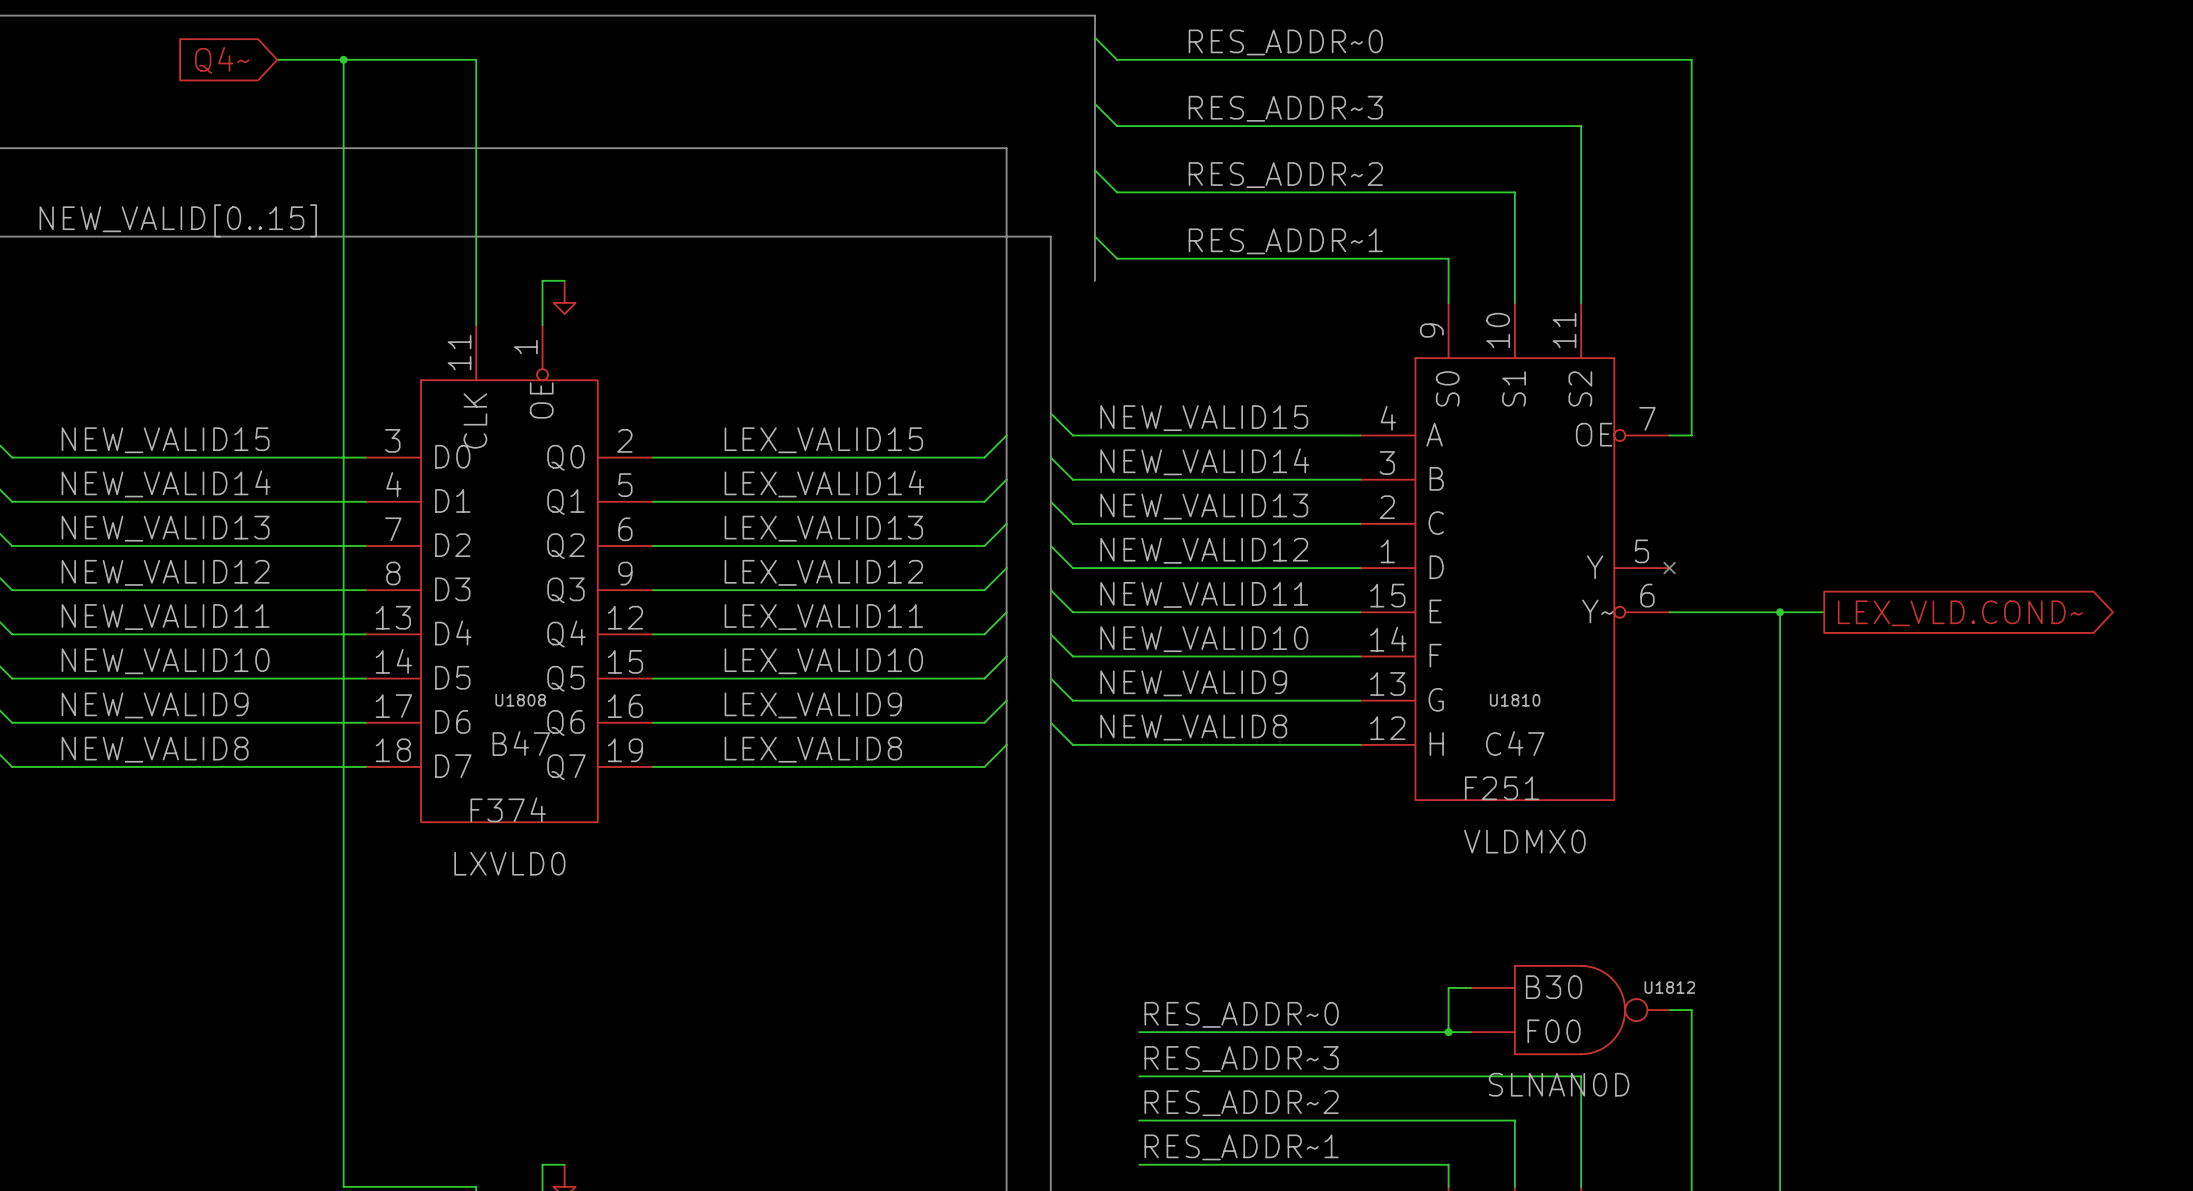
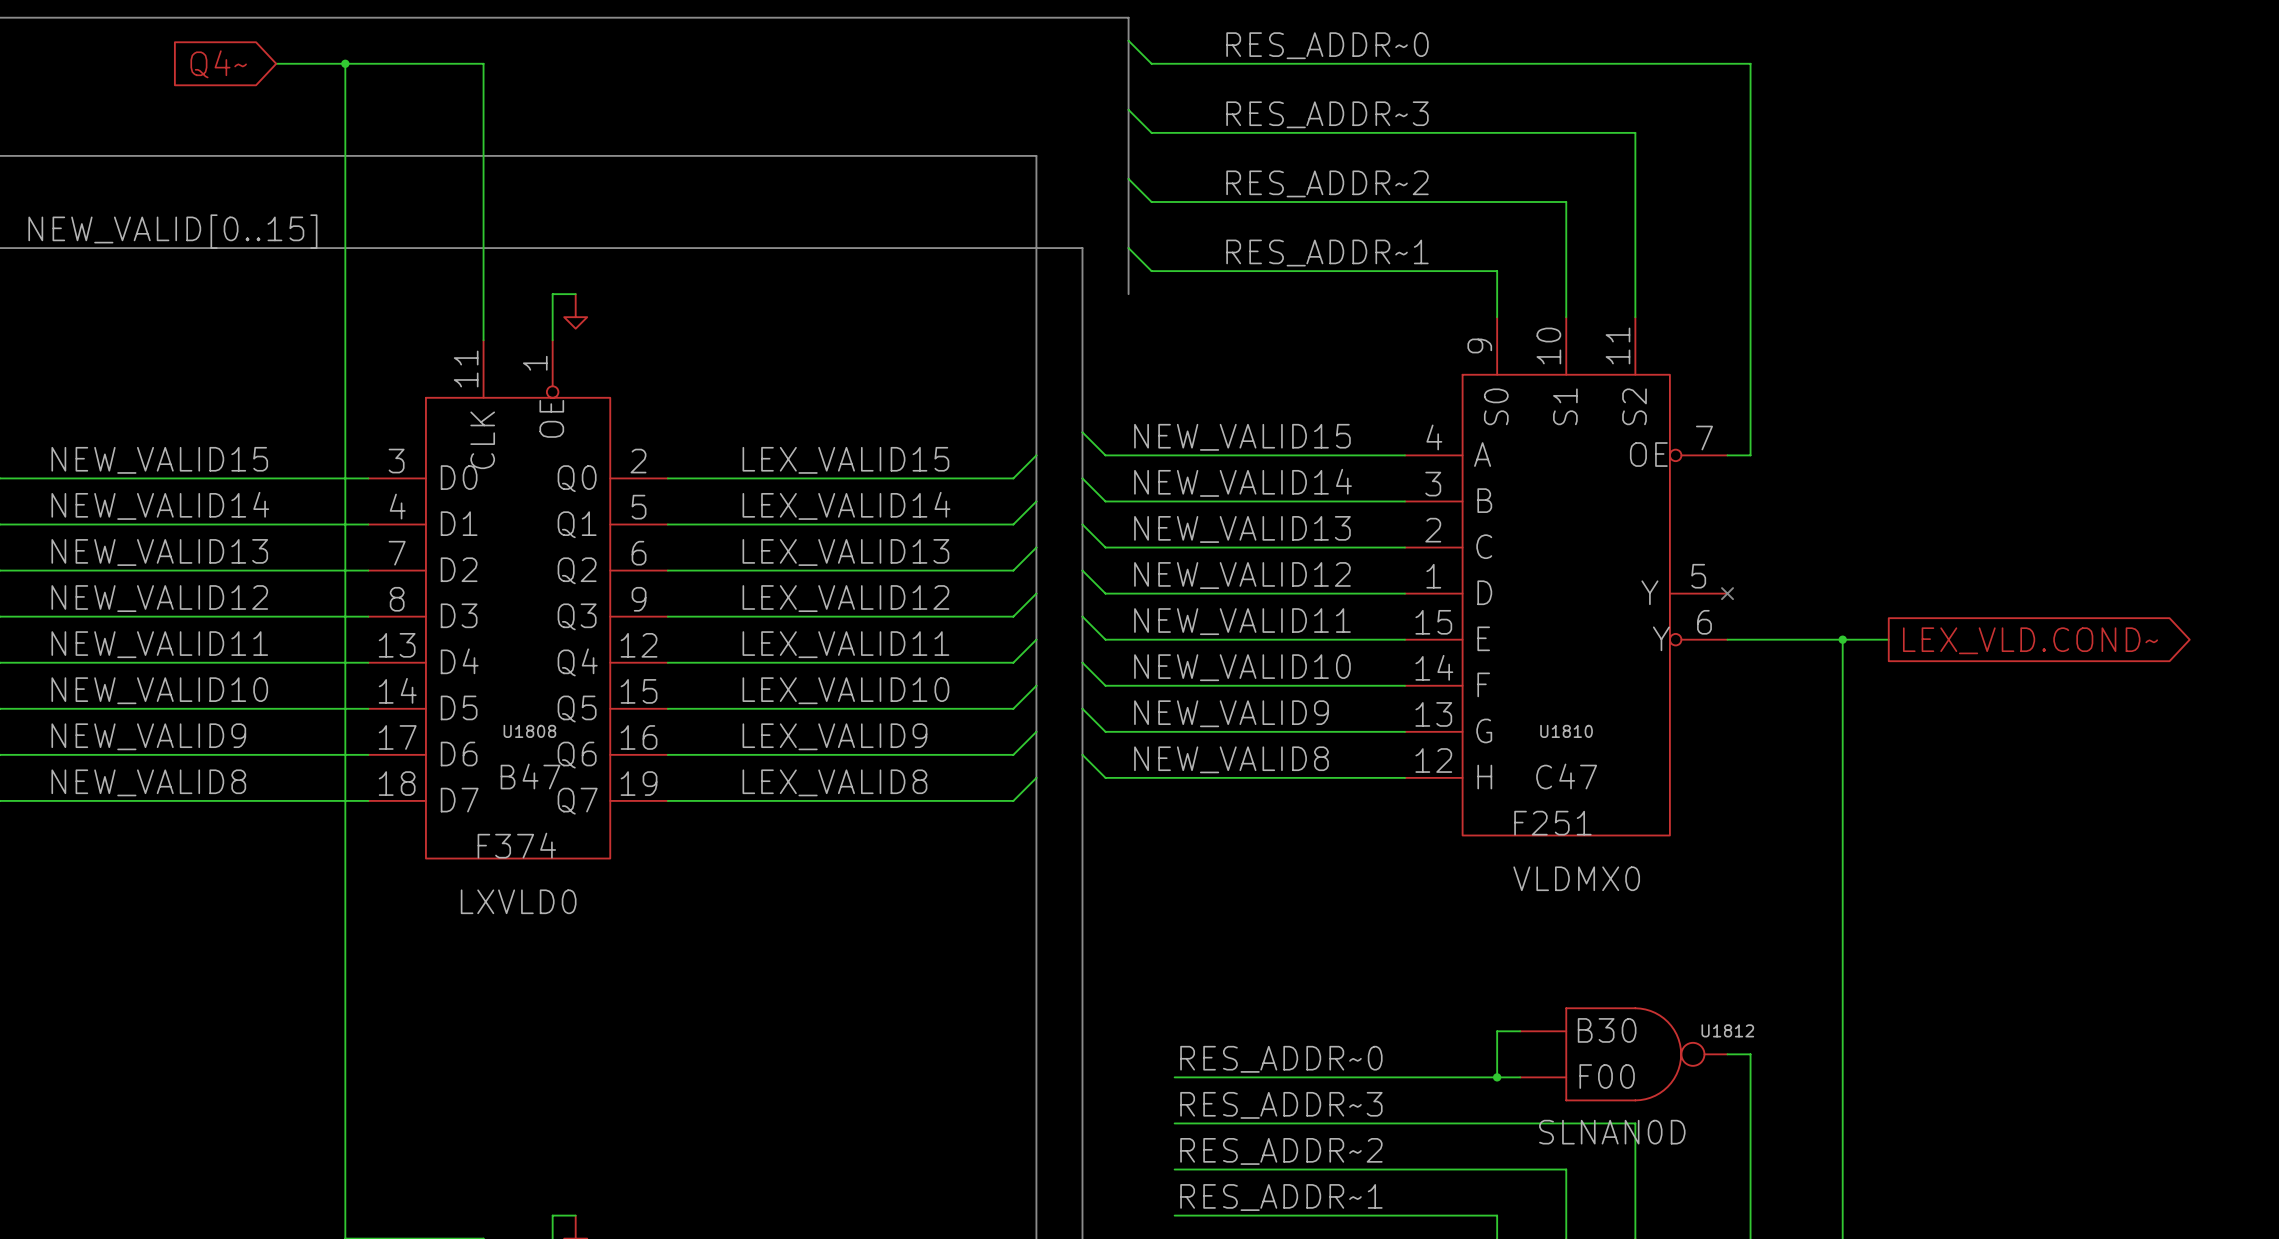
U1810 pin name: Y~ (1597, 611) -> Y (1661, 638)

